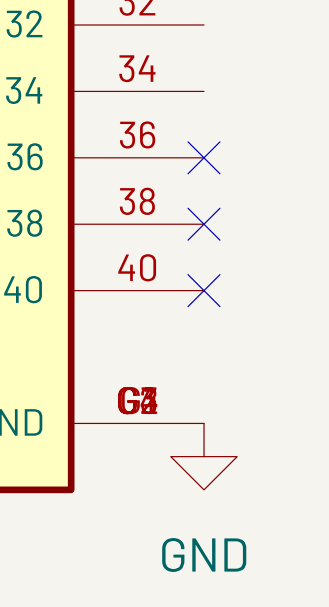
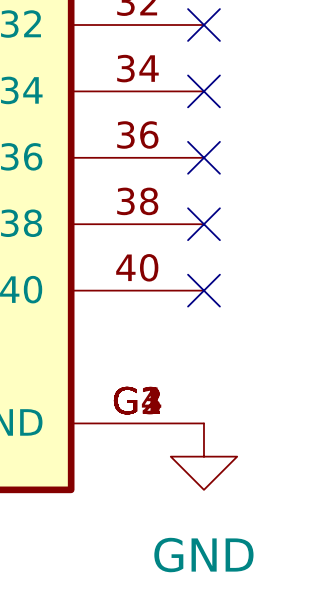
no-connect mark: none -> (203, 25)
no-connect mark: none -> (203, 91)

